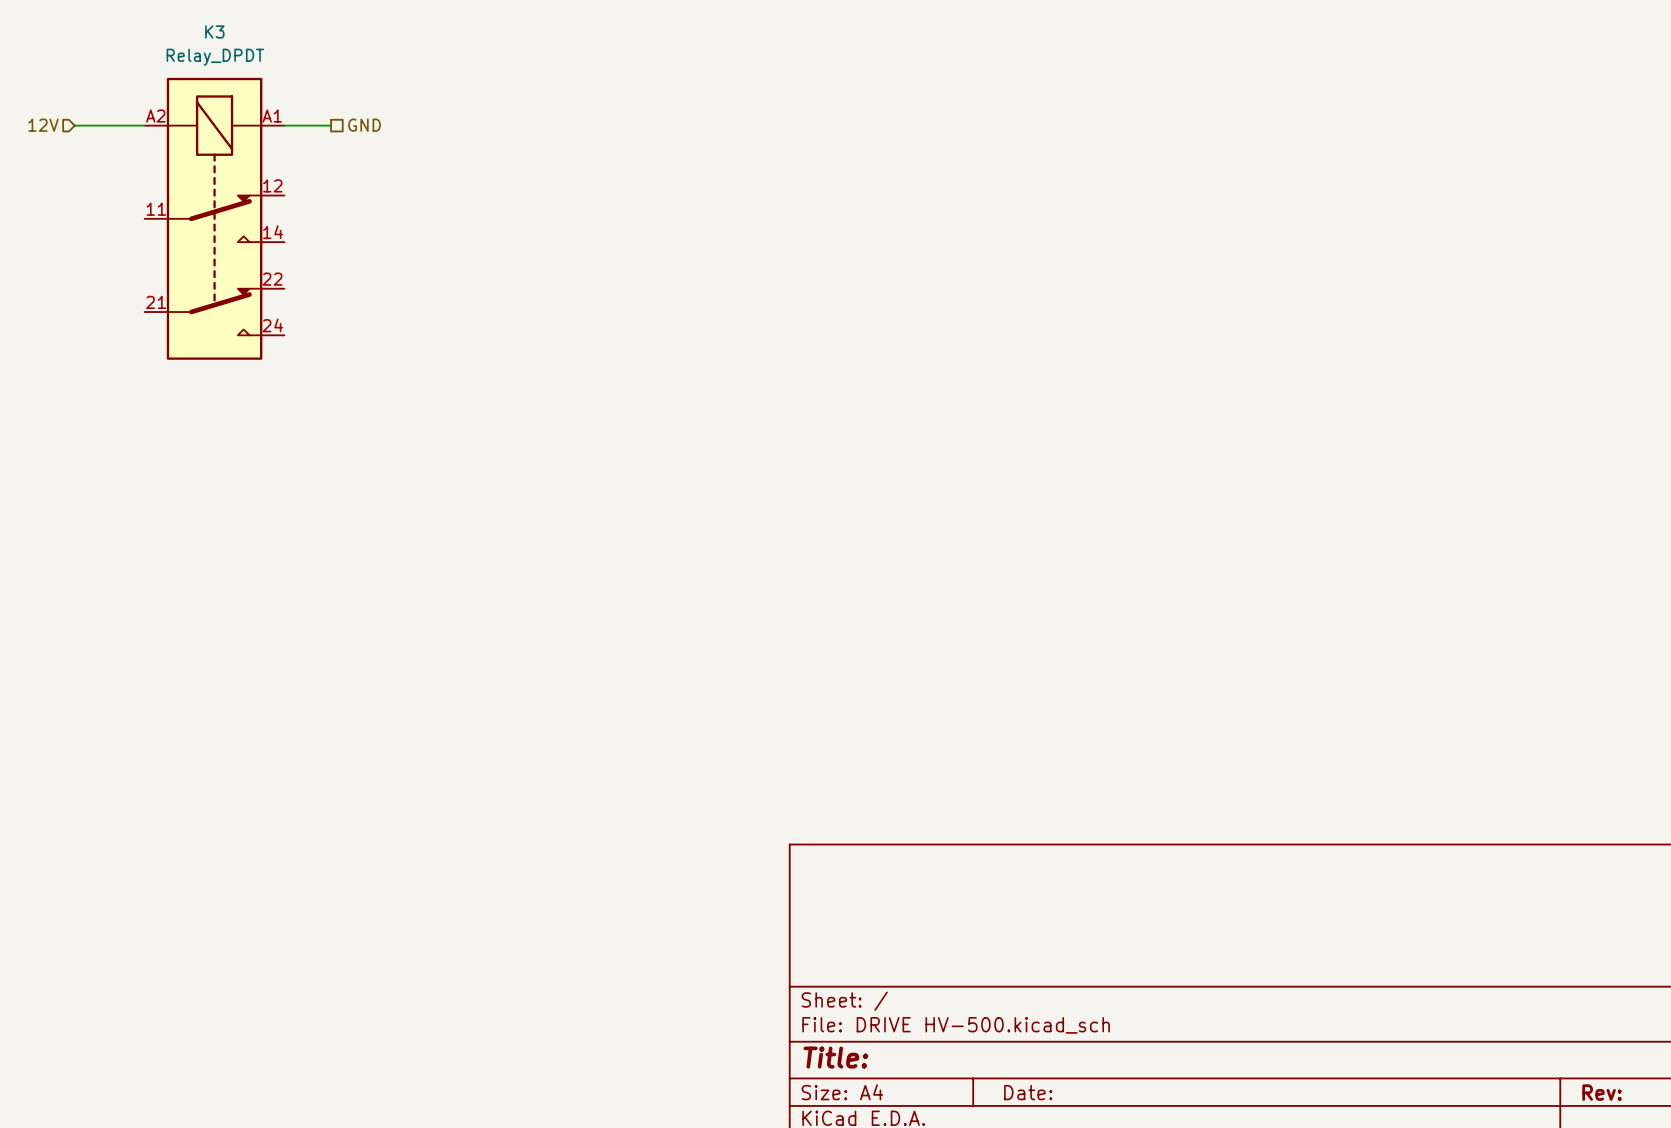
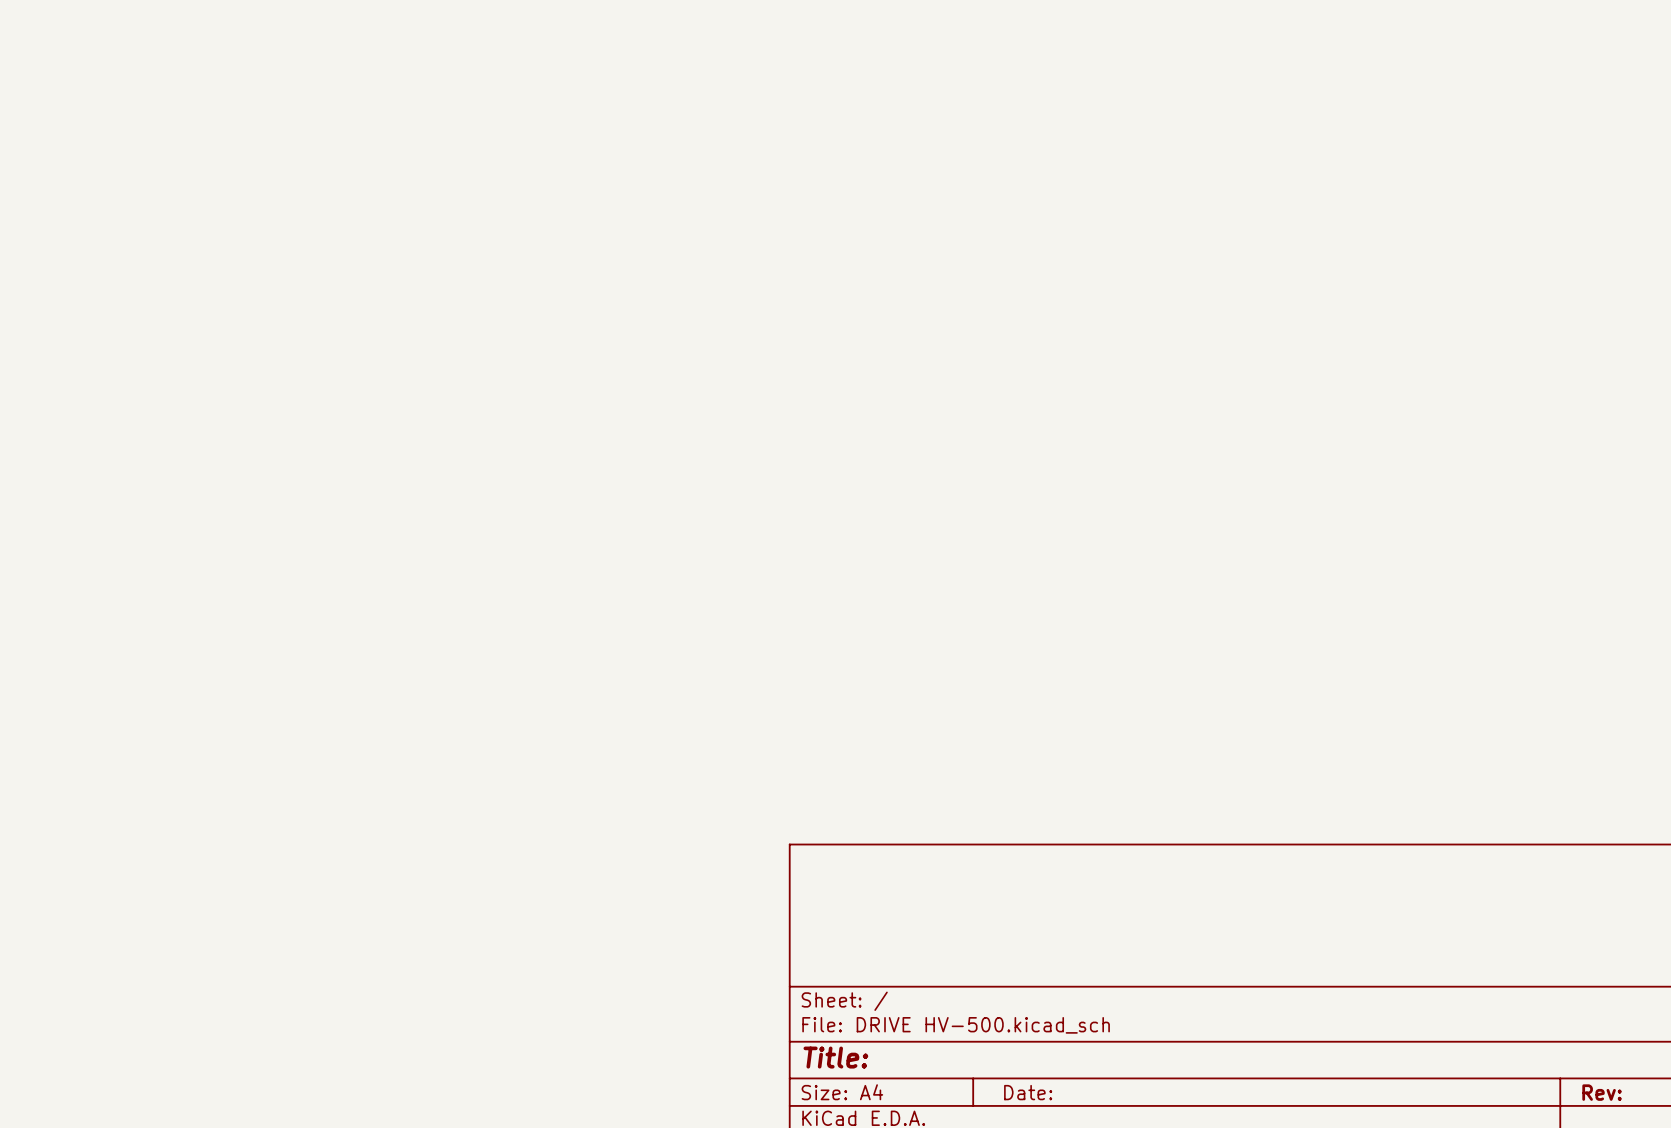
hierarchical label: 12V (43, 125) -> none
wire: (74, 125) (144, 125) -> none
wire: (284, 125) (331, 125) -> none
hierarchical label: GND (364, 125) -> none
K3: Relay_DPDT (214, 218) -> none

